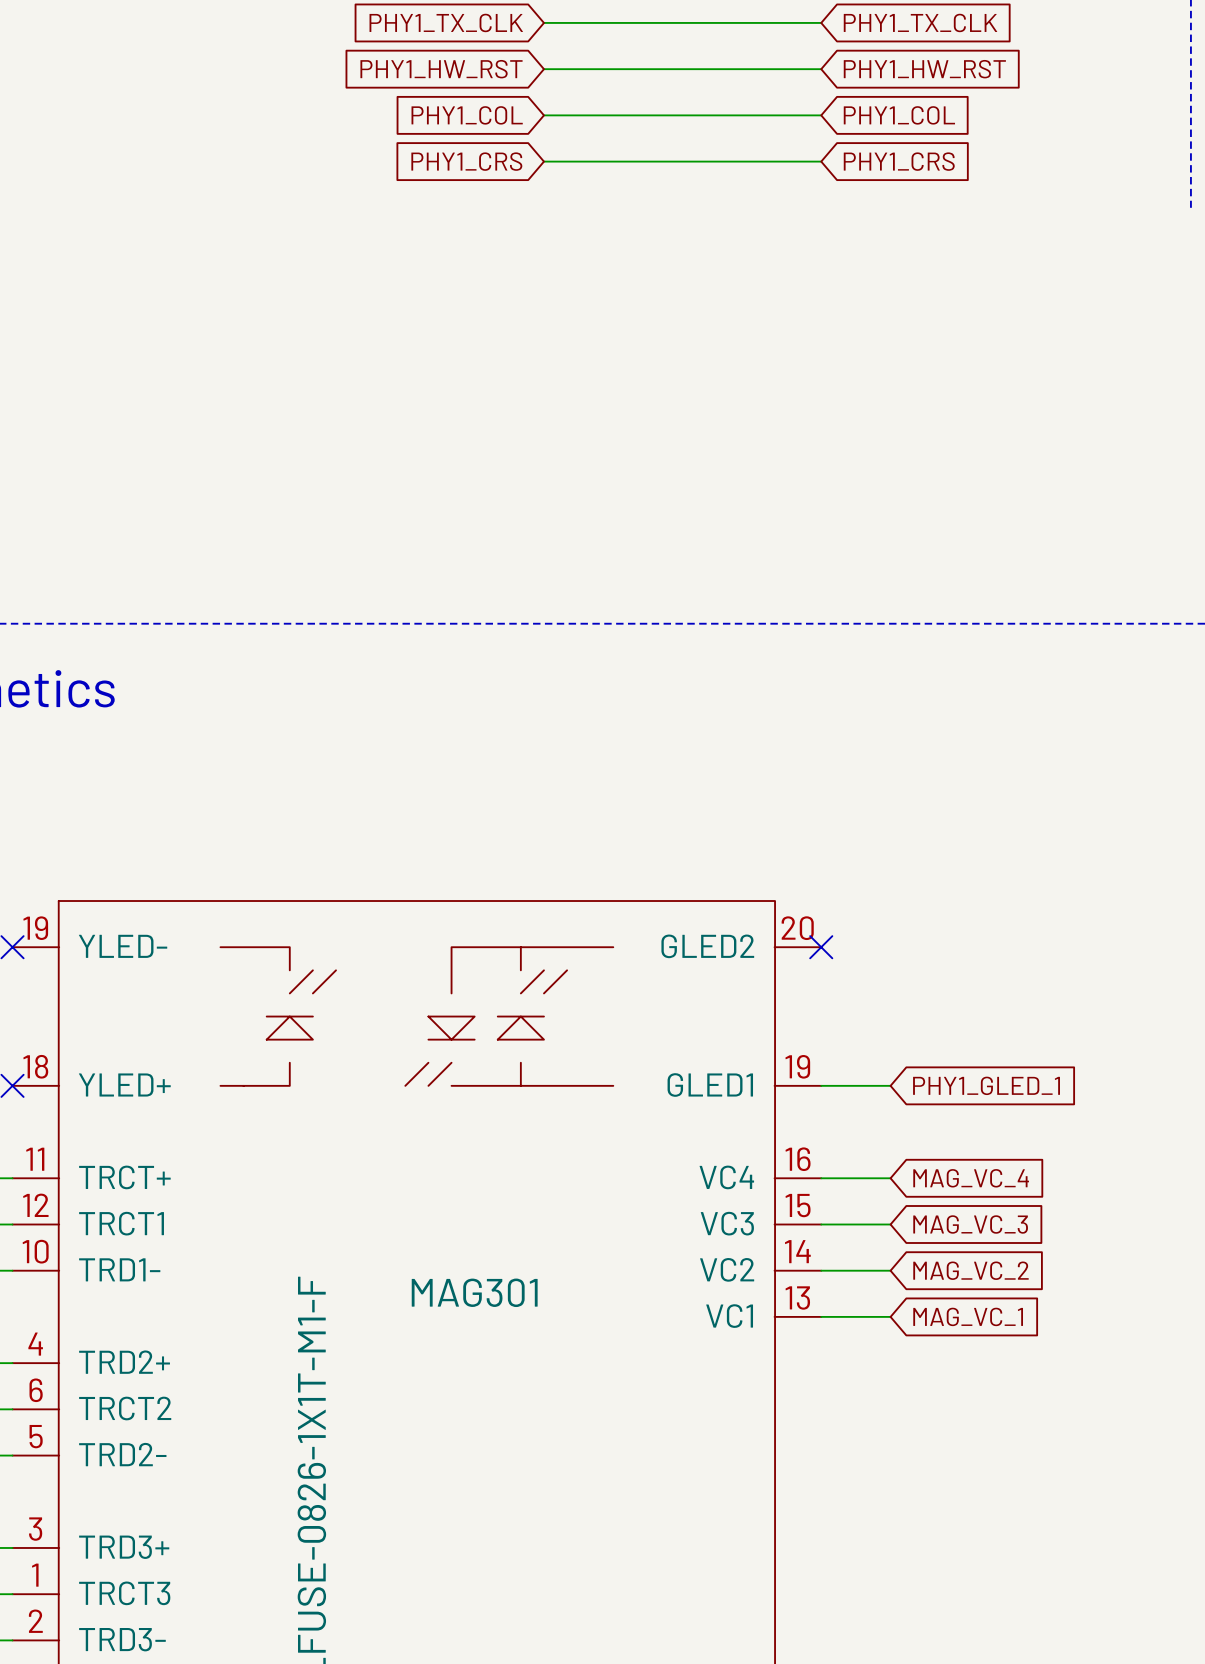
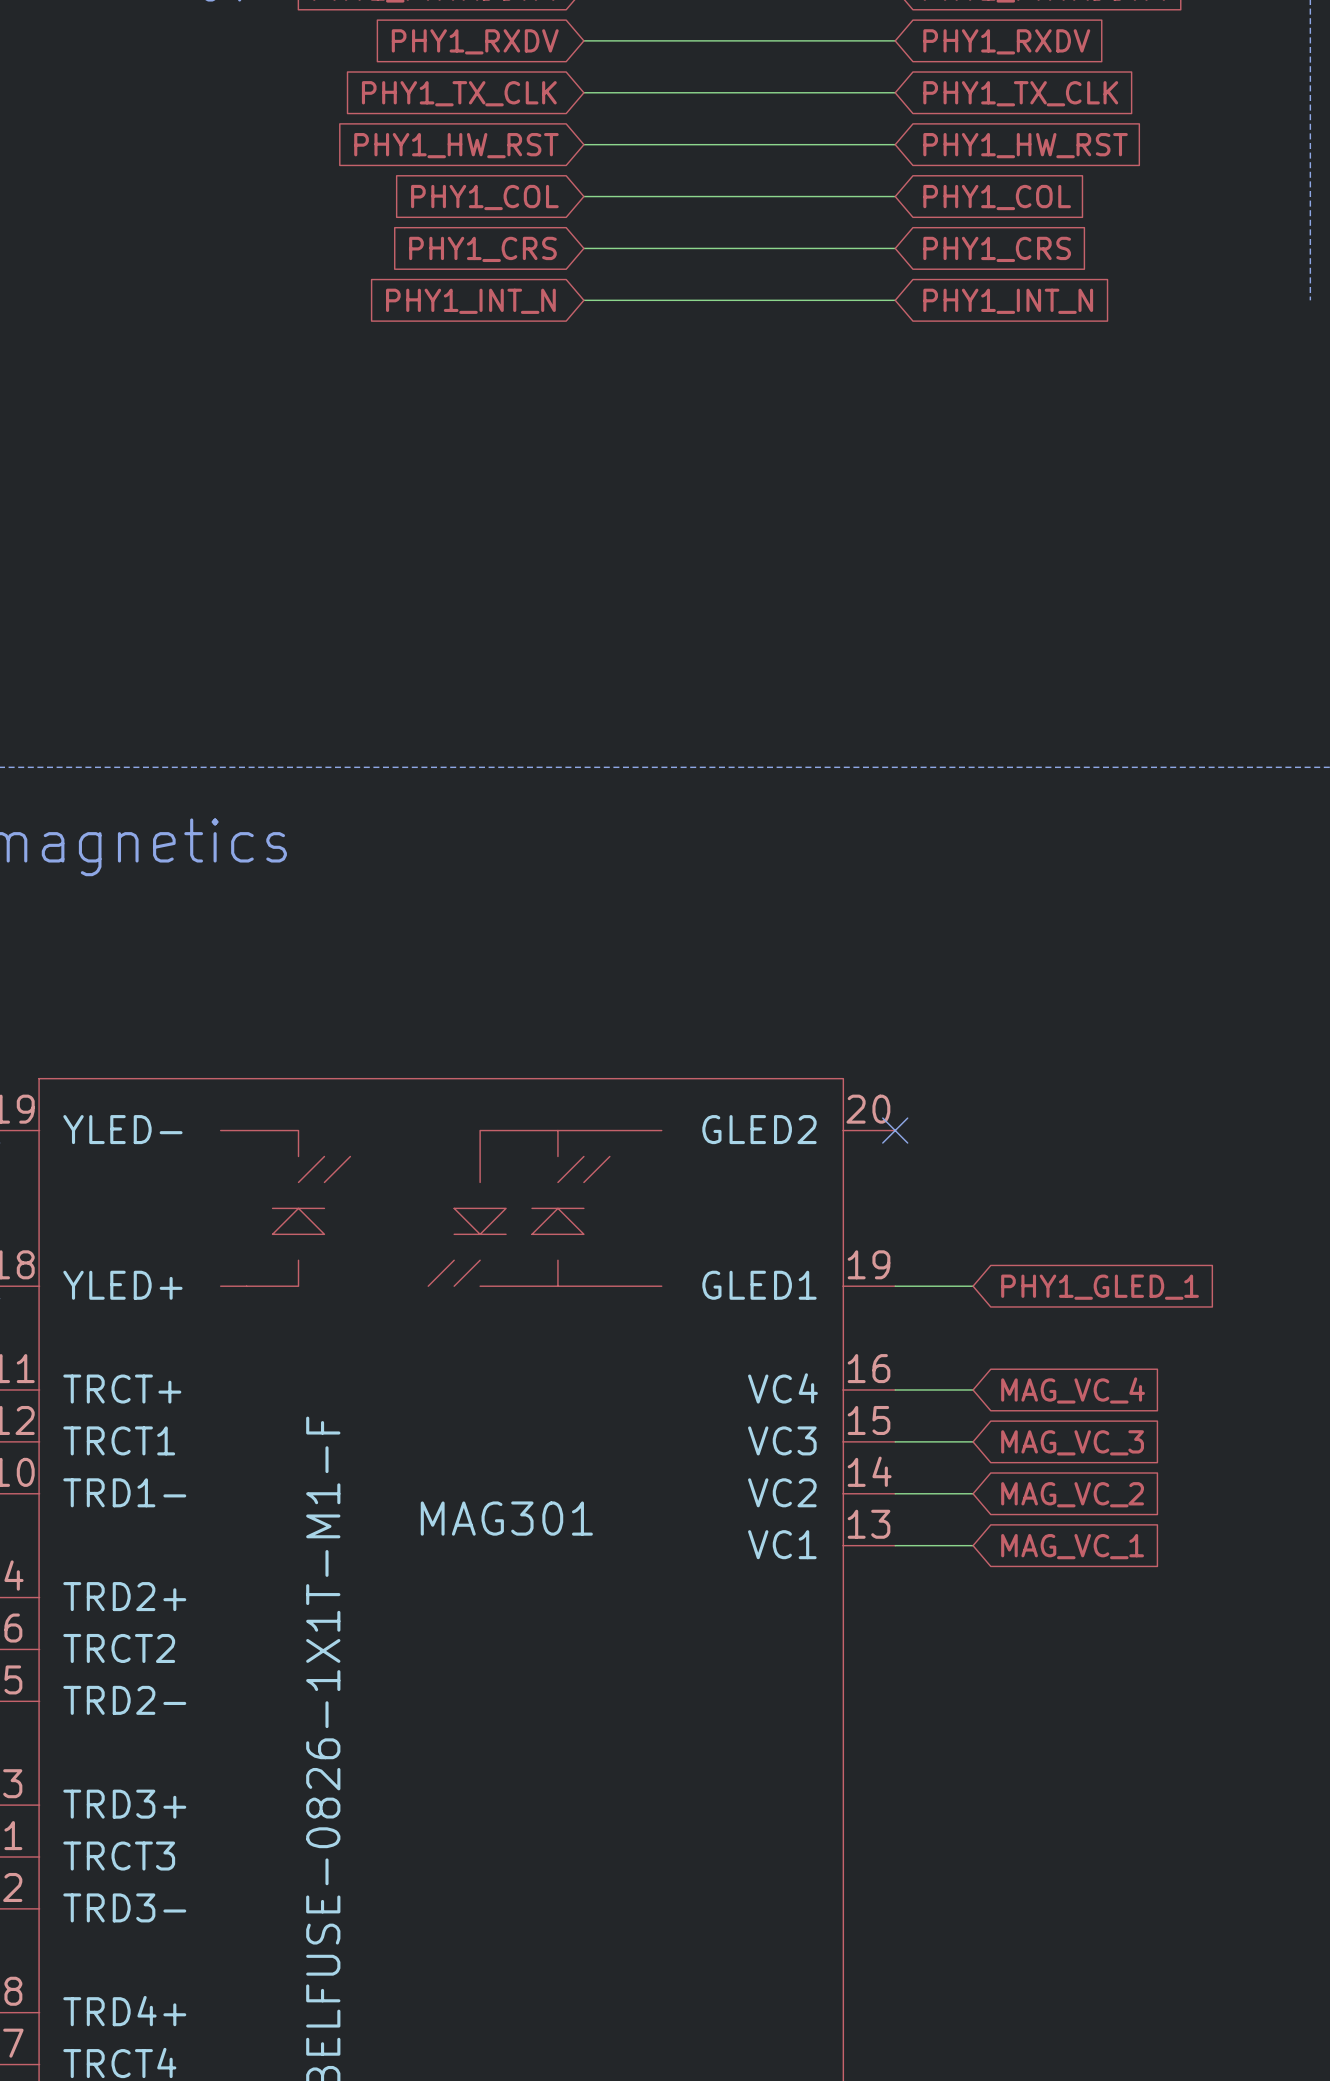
global label: none -> PHY1_INT_N (470, 301)
wire: none -> (583, 300) (895, 300)
global label: none -> PHY1_INT_N (1008, 301)

